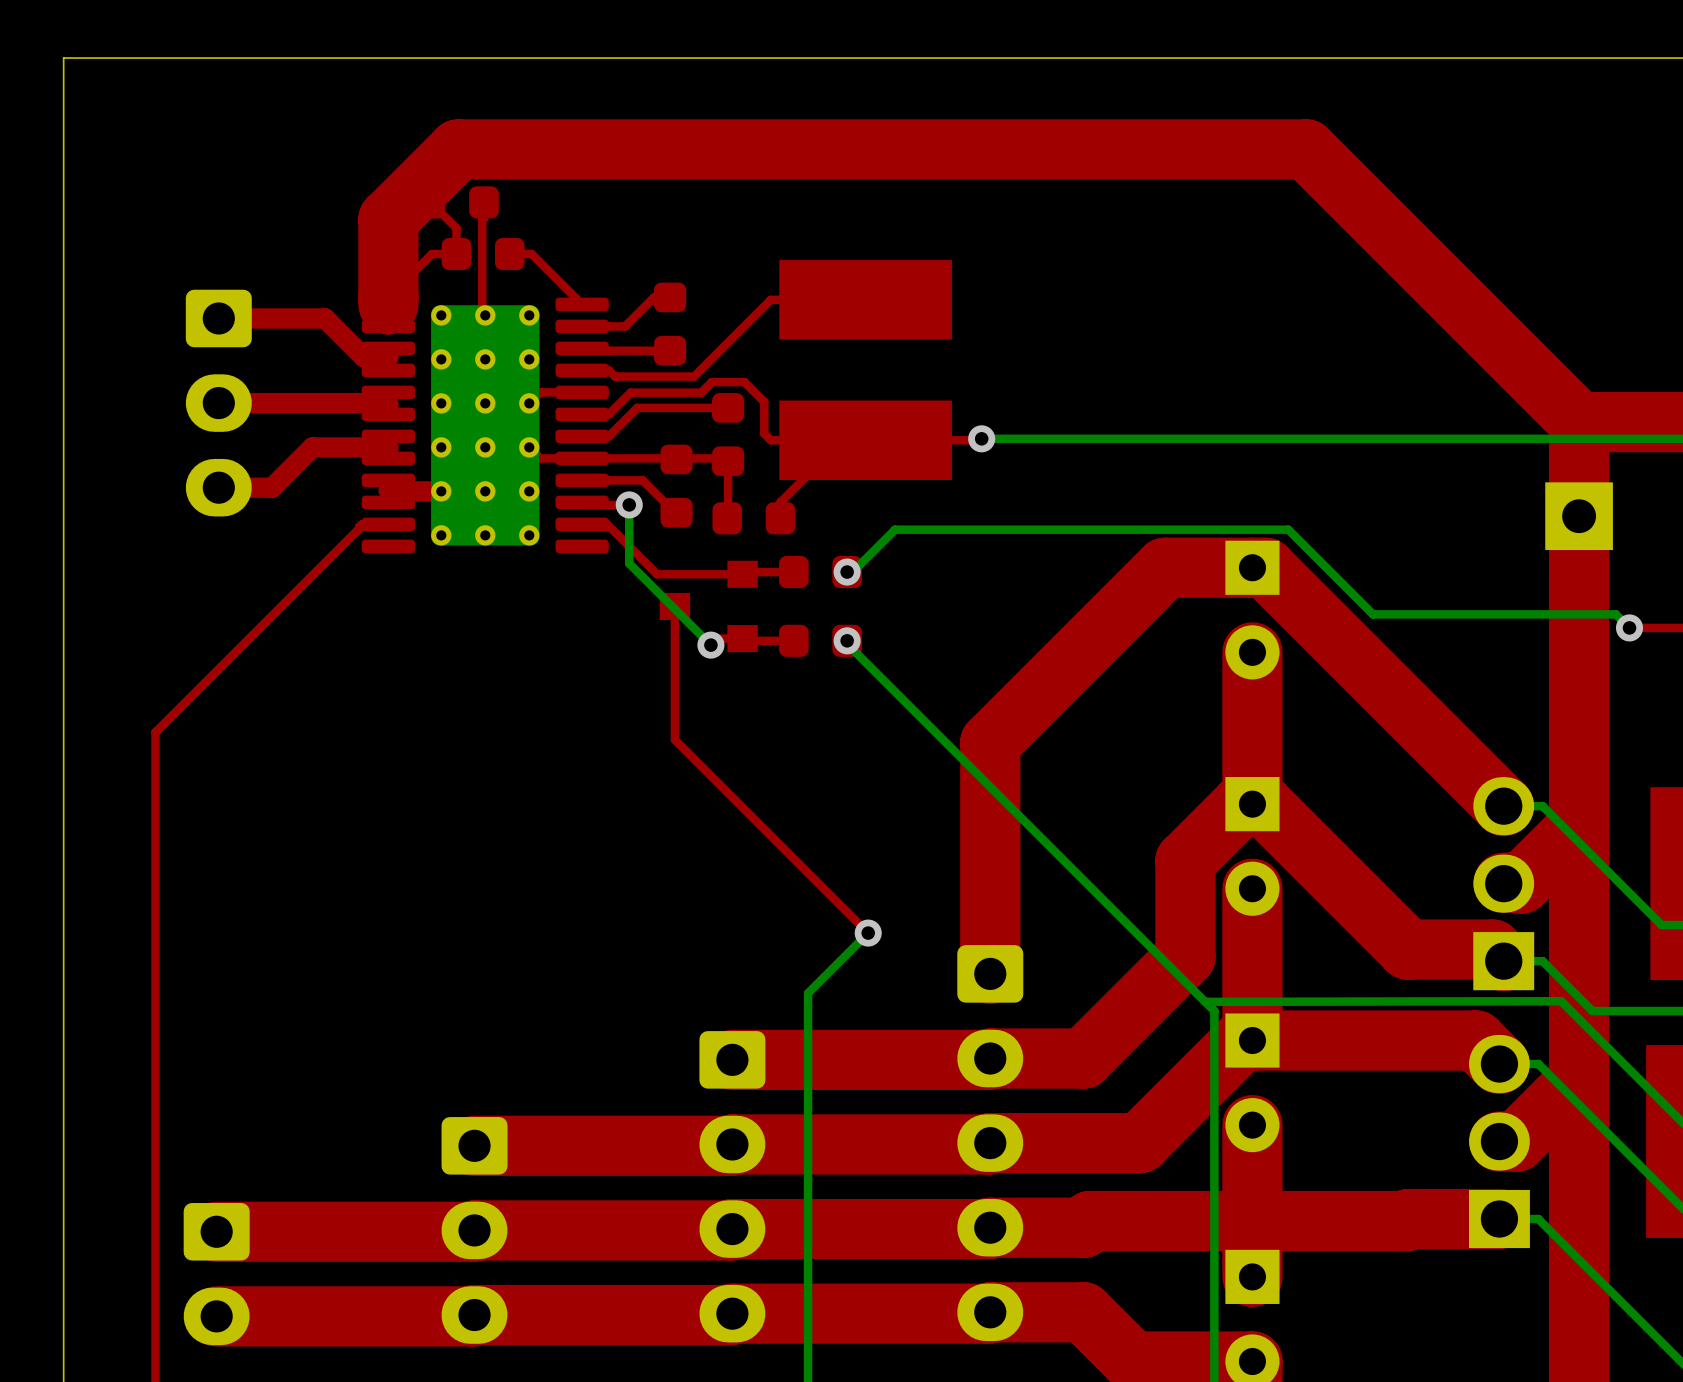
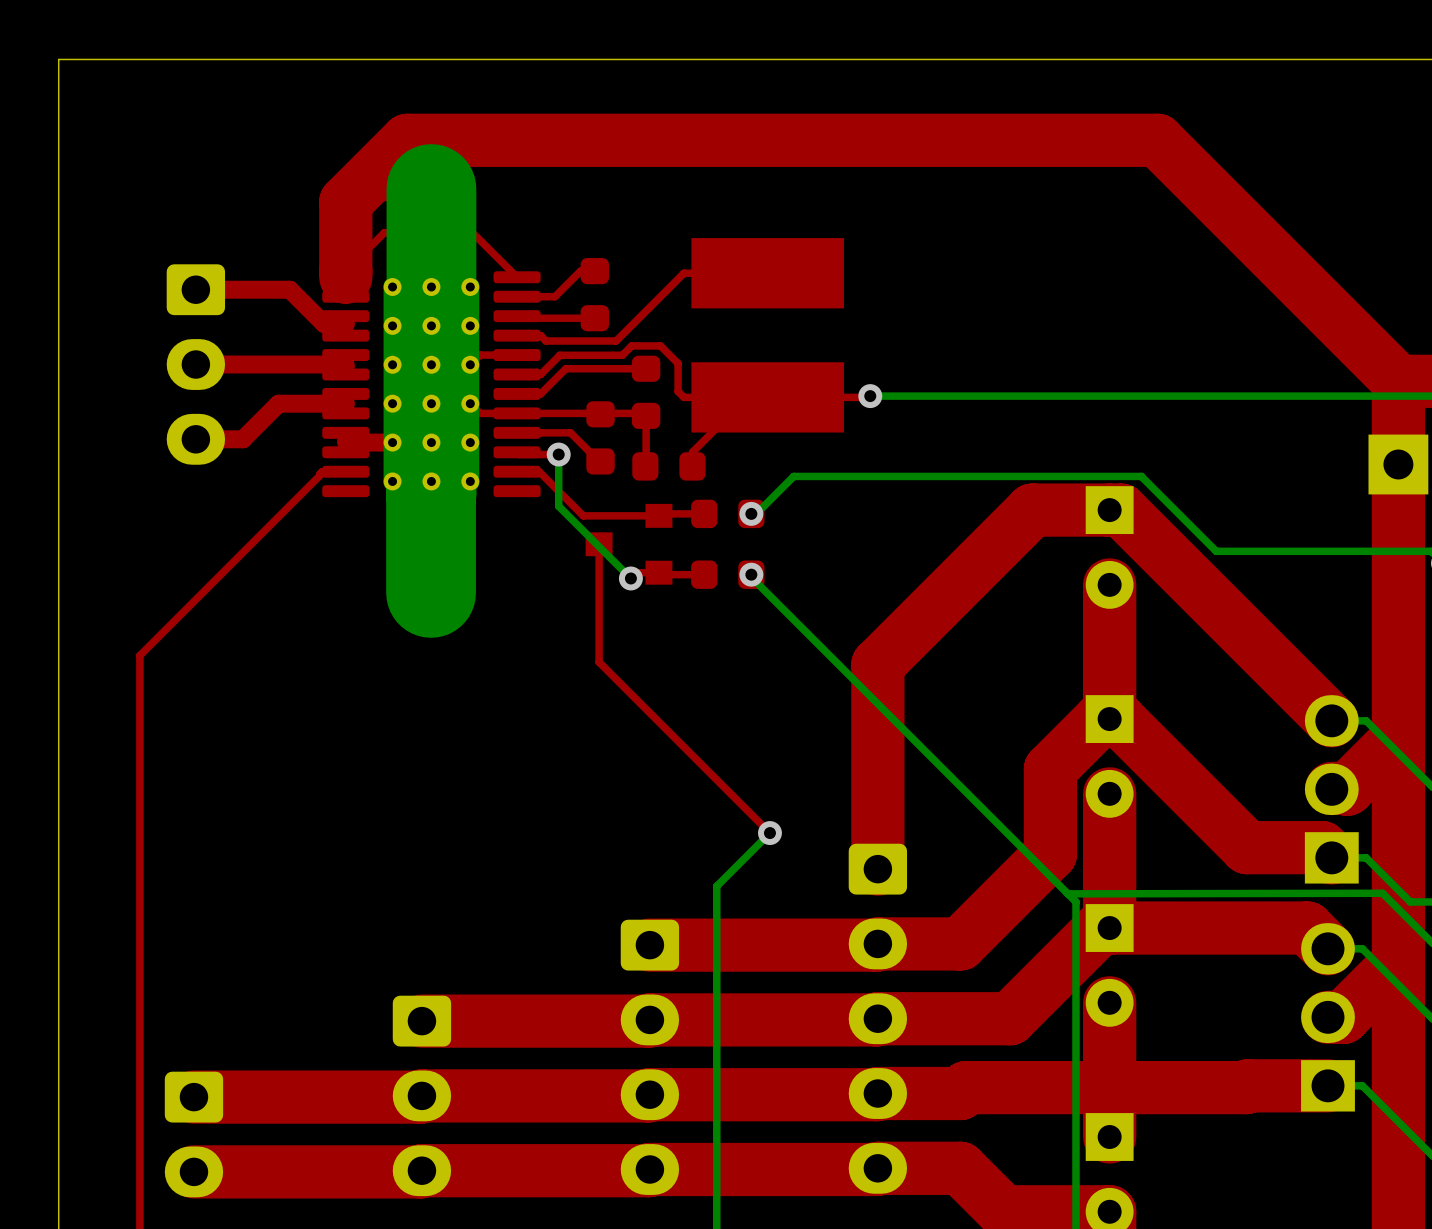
bottom track: none -> (431, 189) (431, 287)
bottom track: none -> (431, 494) (431, 592)

